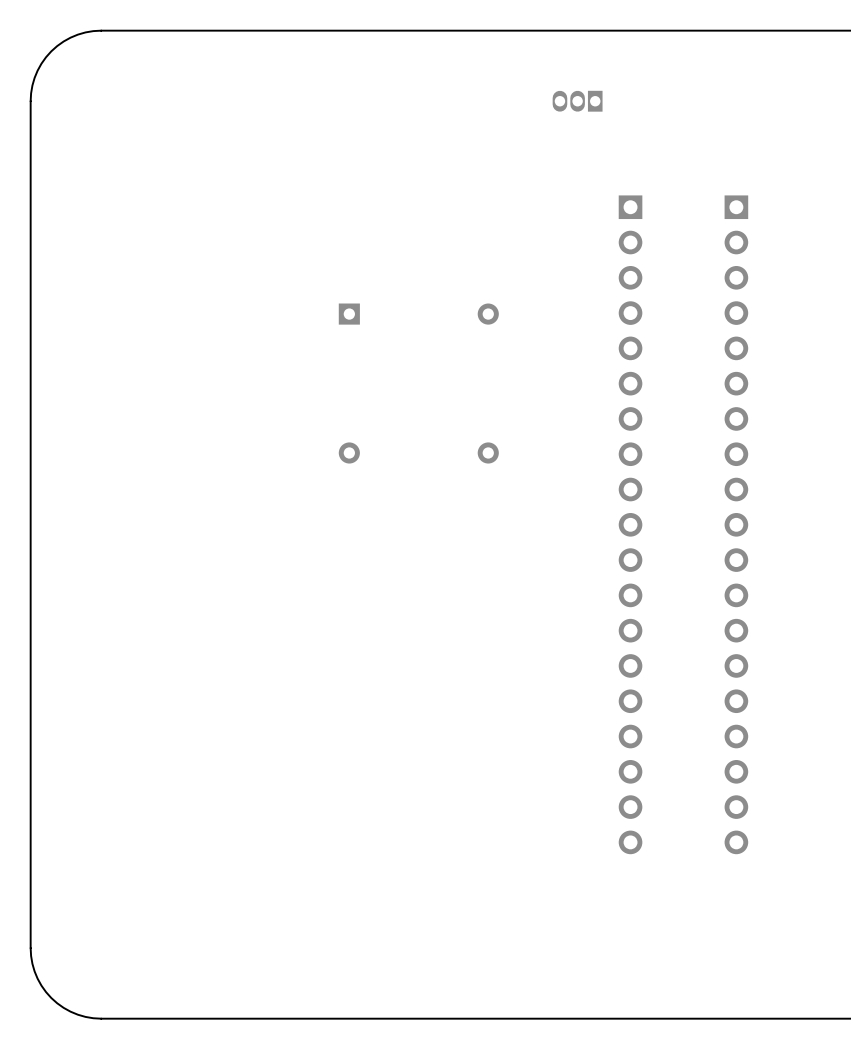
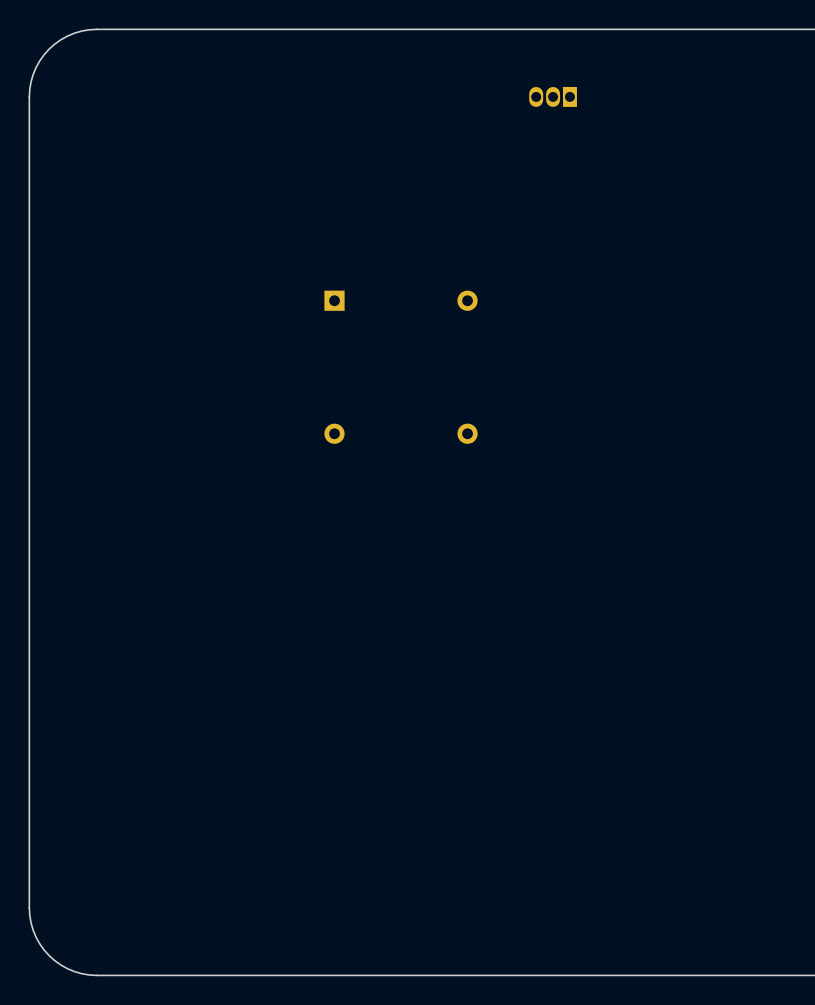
part: (630, 524) -> none
part: (736, 524) -> none

